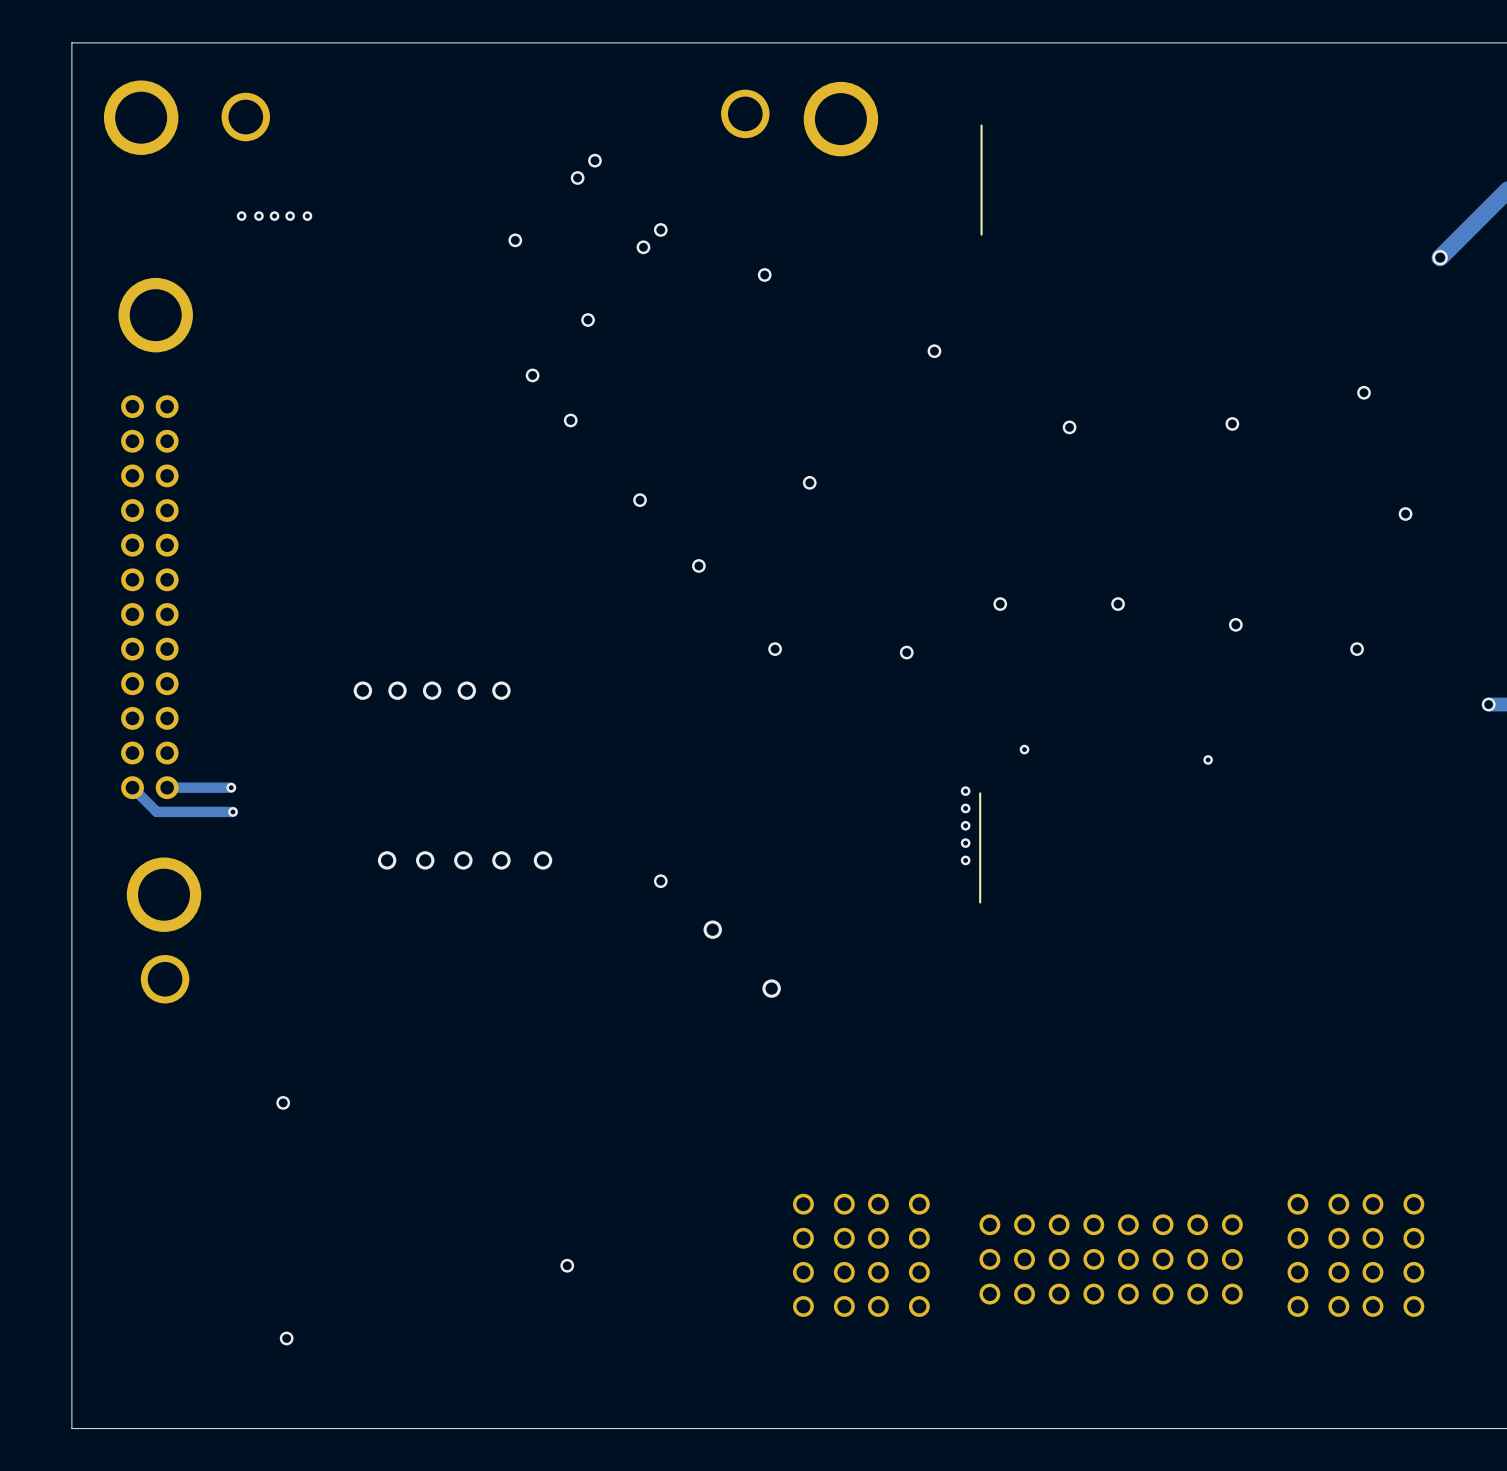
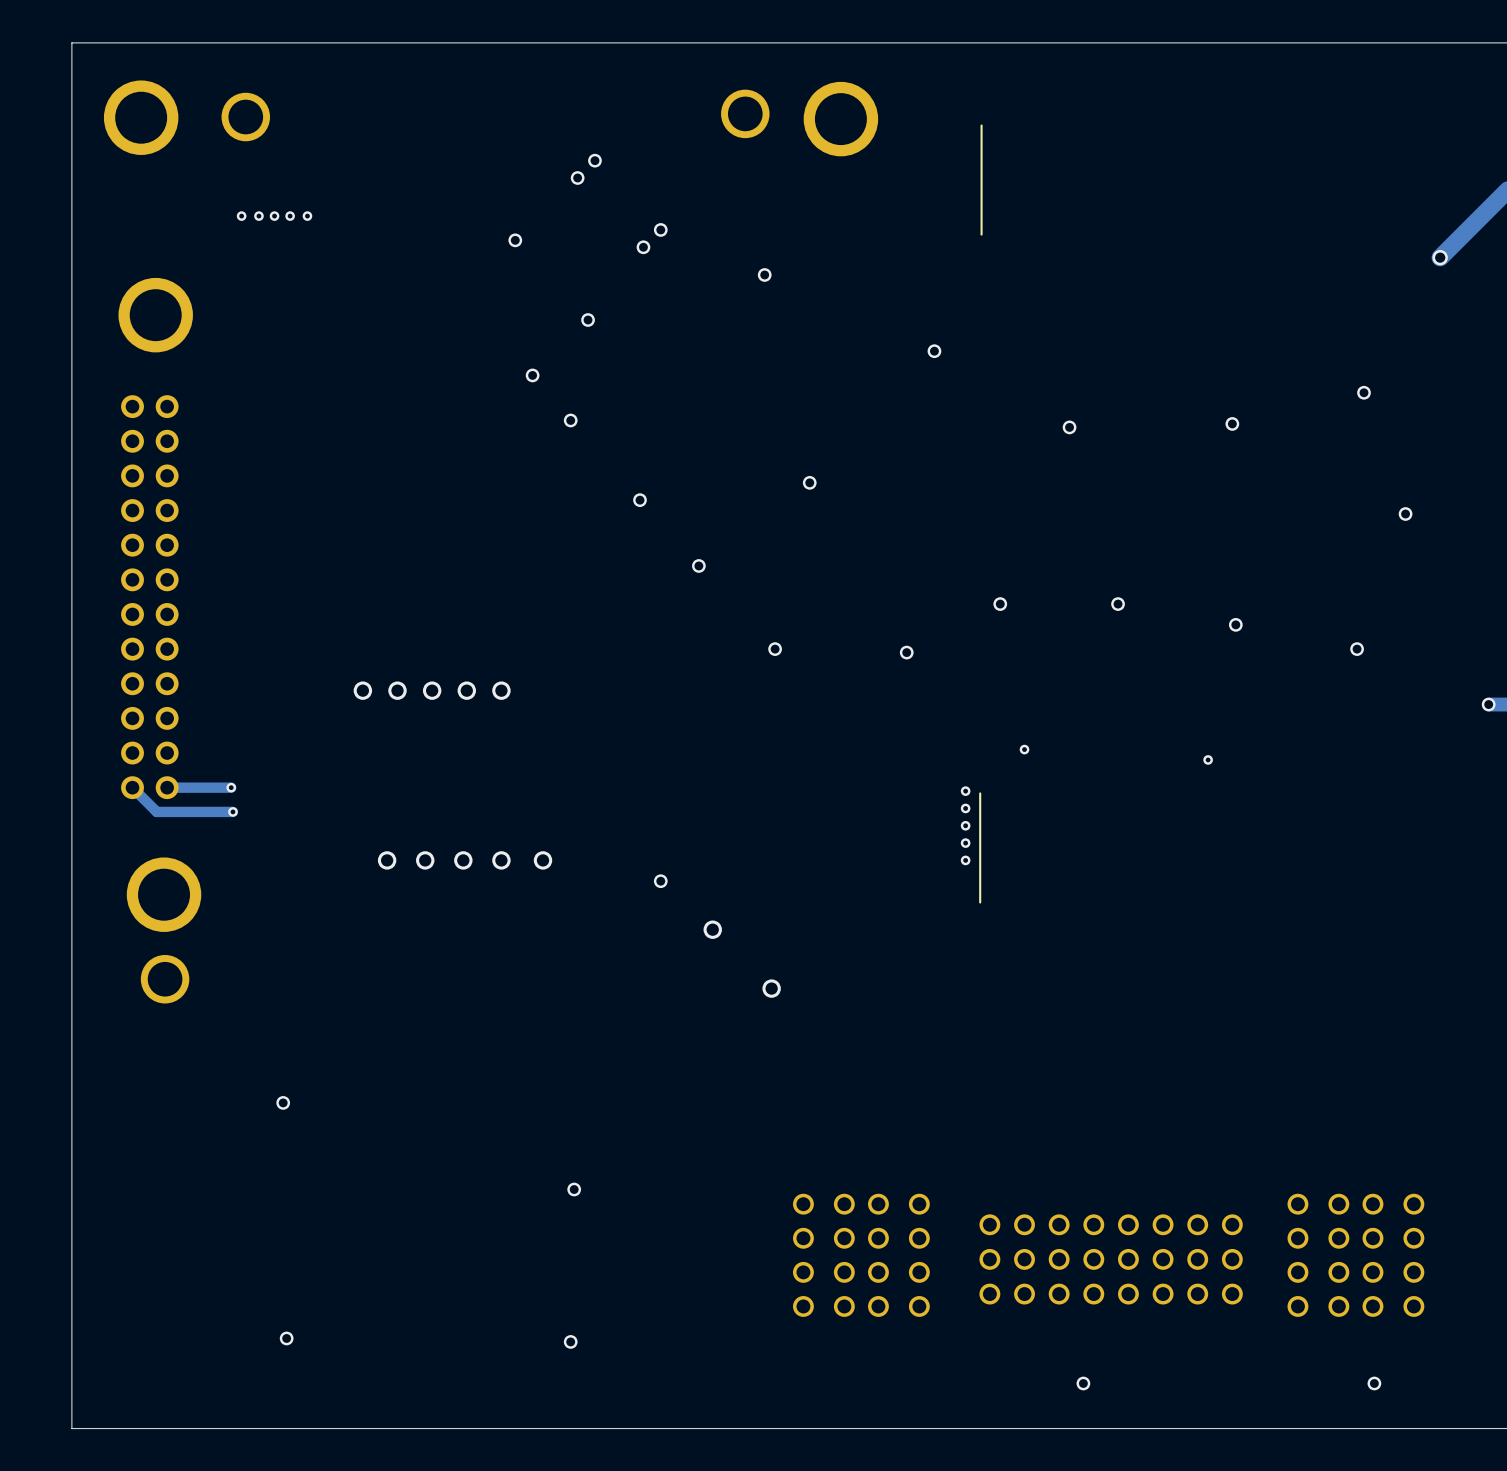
via: none -> (574, 1189)
via: (567, 1265) -> none
via: none -> (570, 1341)
via: none -> (1083, 1383)
via: none -> (1374, 1383)

